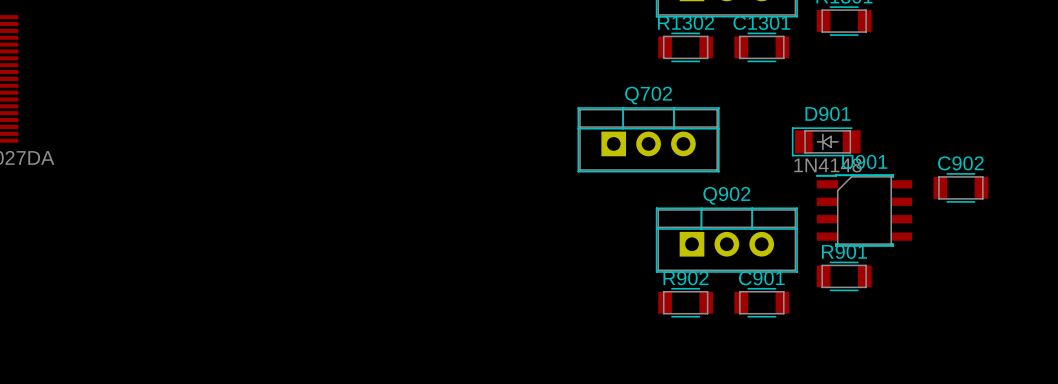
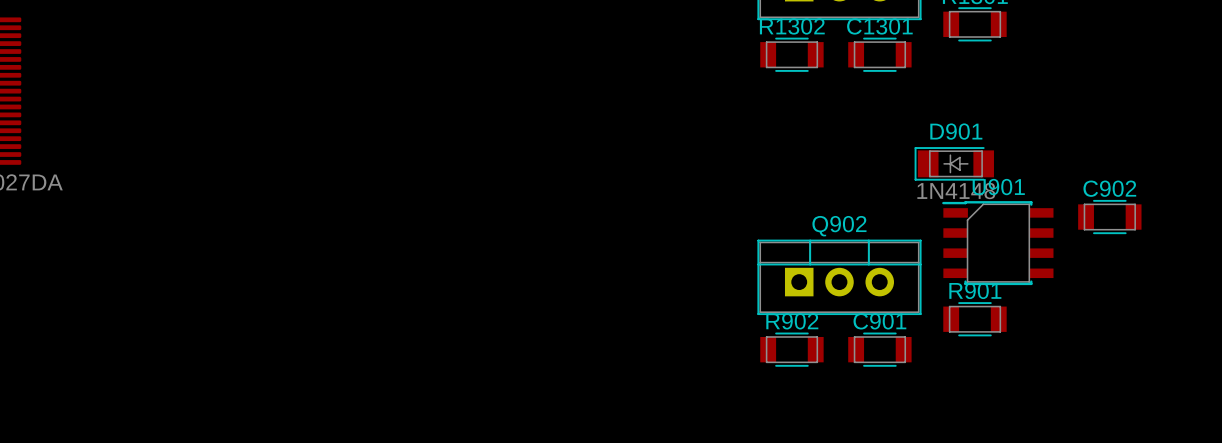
Q702: (648, 139) -> none

